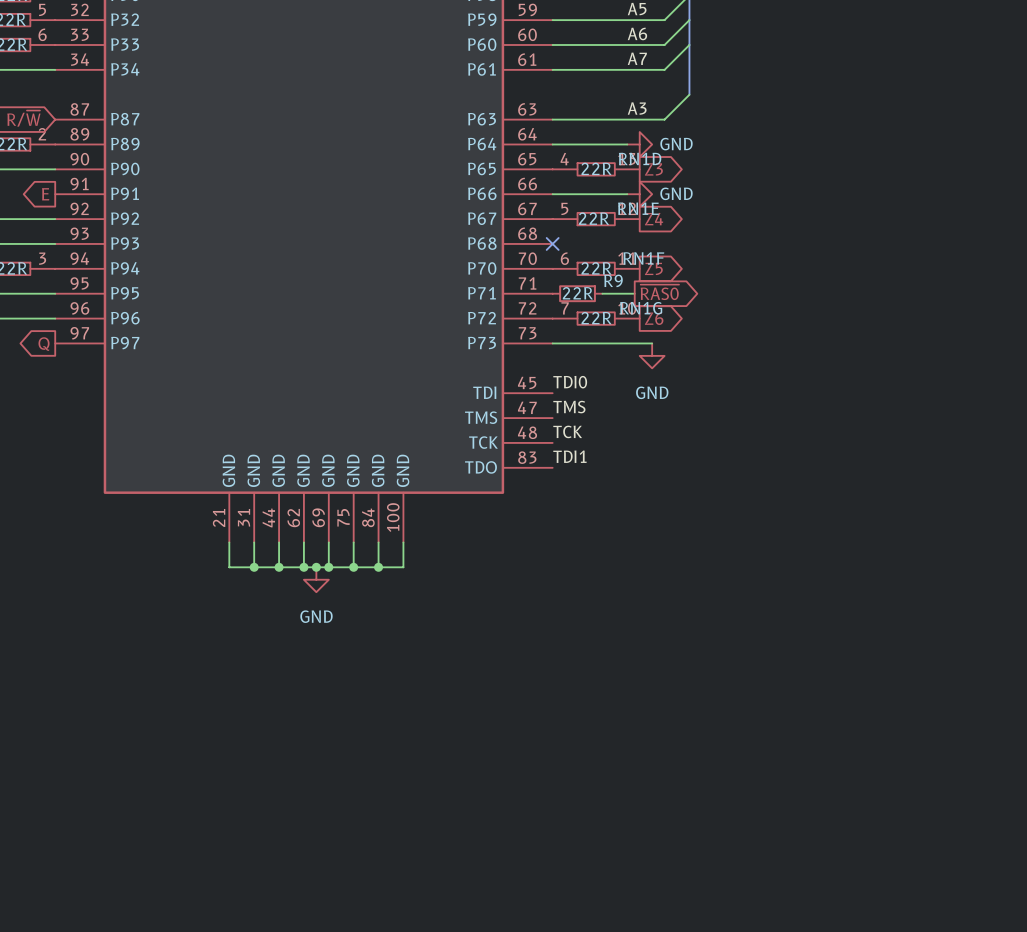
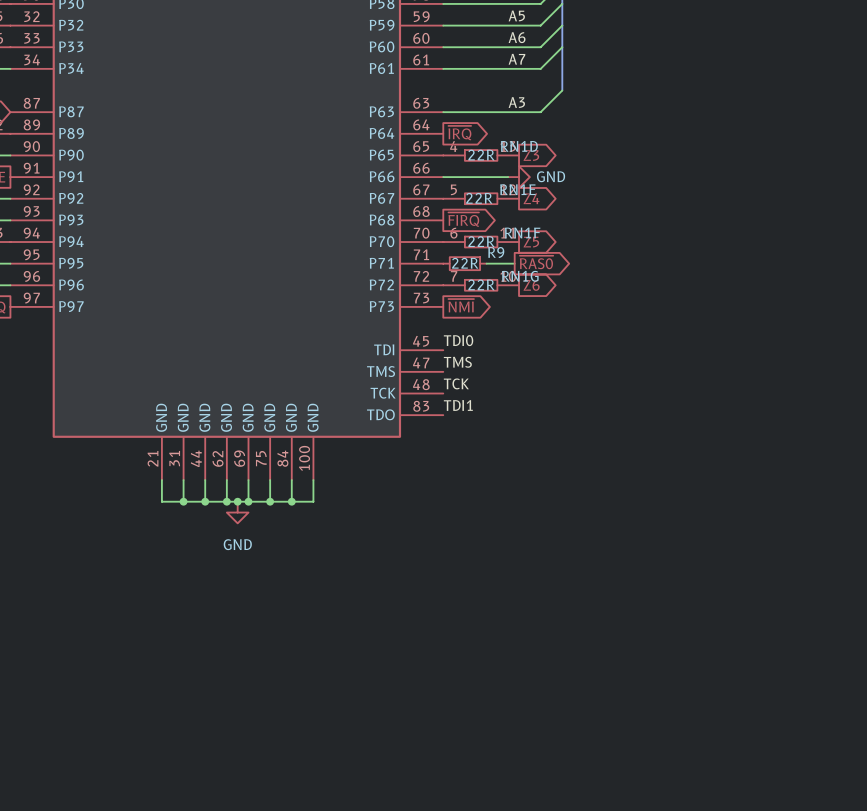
global label: none -> ~{IRQ} (459, 133)
wire: (552, 144) (627, 144) -> none
power symbol: GND (639, 144) -> none
no-connect mark: (552, 243) -> none
global label: none -> ~{FIRQ} (463, 219)
global label: none -> ~{NMI} (461, 305)
wire: (552, 343) (652, 343) -> none
power symbol: GND (652, 355) -> none

